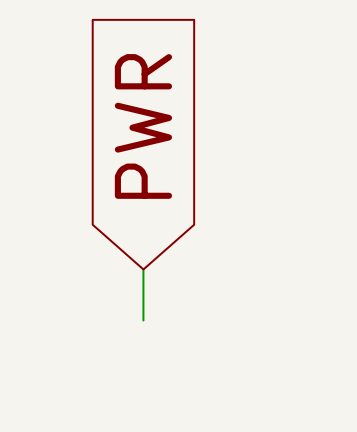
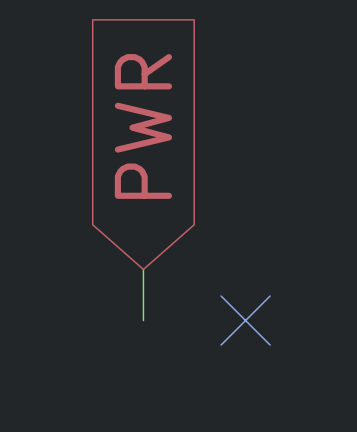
no-connect mark: none -> (245, 320)

